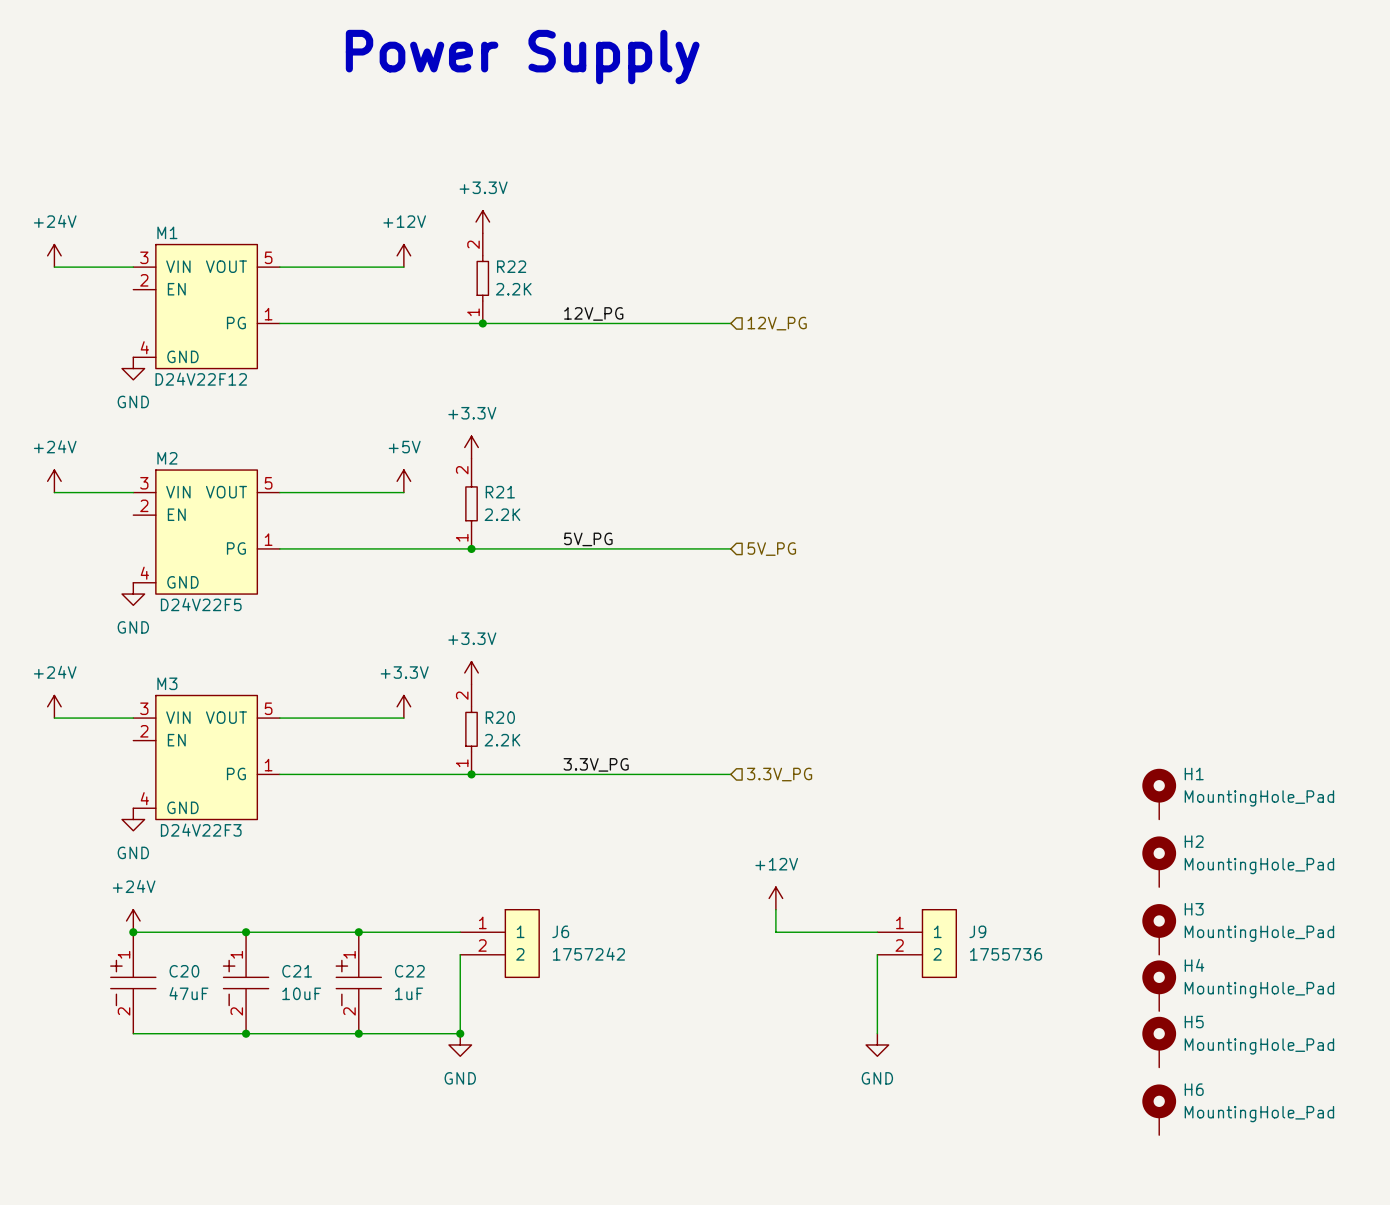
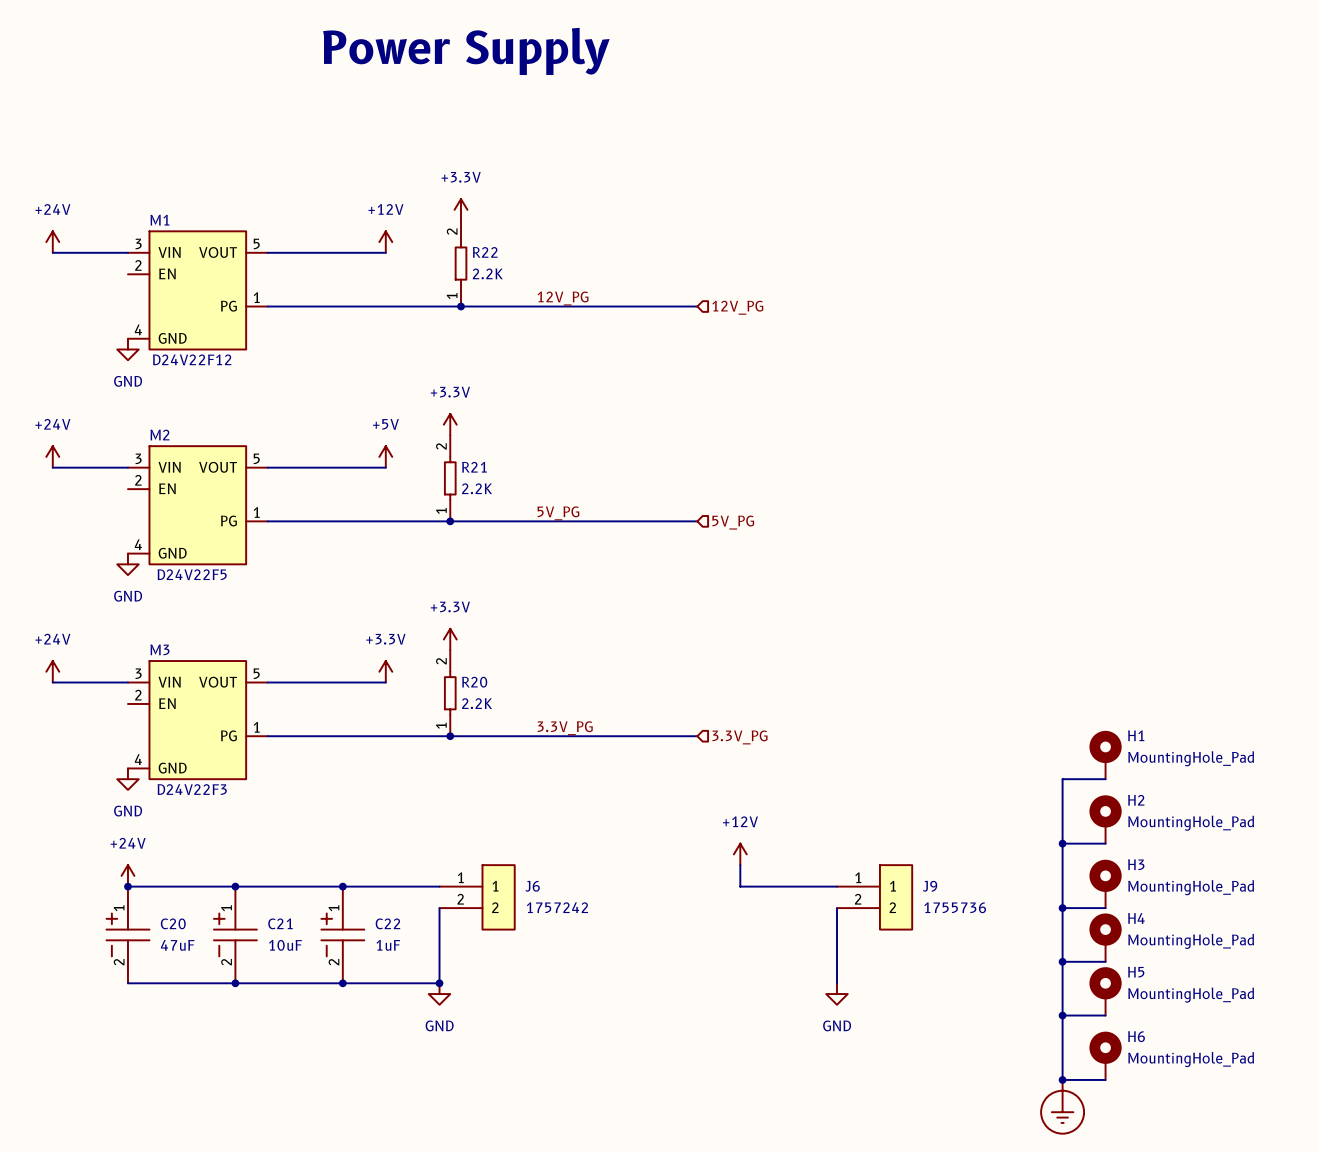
wire: none -> (1105, 779) (1062, 779) (1062, 1079) (1105, 1079)
wire: none -> (1062, 843) (1105, 843)
junction: none -> (1062, 843)
wire: none -> (1062, 908) (1105, 908)
junction: none -> (1062, 908)
wire: none -> (1062, 961) (1105, 961)
junction: none -> (1062, 961)
wire: none -> (1062, 1015) (1105, 1015)
junction: none -> (1062, 1015)
junction: none -> (1062, 1079)
power symbol: none -> (1062, 1106)

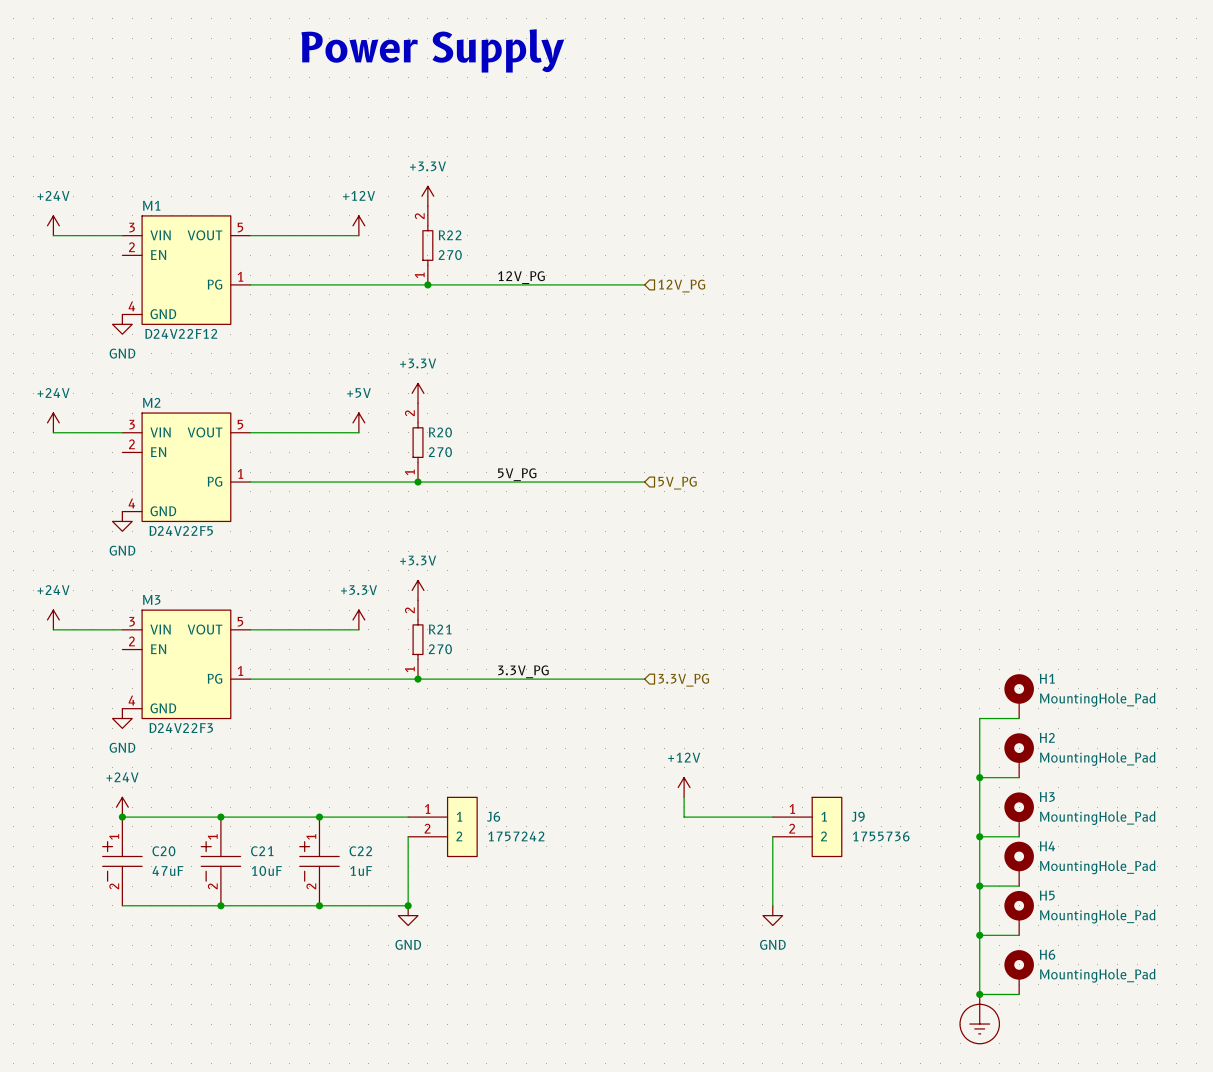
R22 text: 2.2K (487, 273) -> 270 (450, 255)
R21 name: R21 (474, 467) -> R20 (440, 432)
R21 text: 2.2K (477, 488) -> 270 (440, 452)
R20 name: R20 (474, 682) -> R21 (440, 629)
R20 text: 2.2K (477, 703) -> 270 (440, 649)

